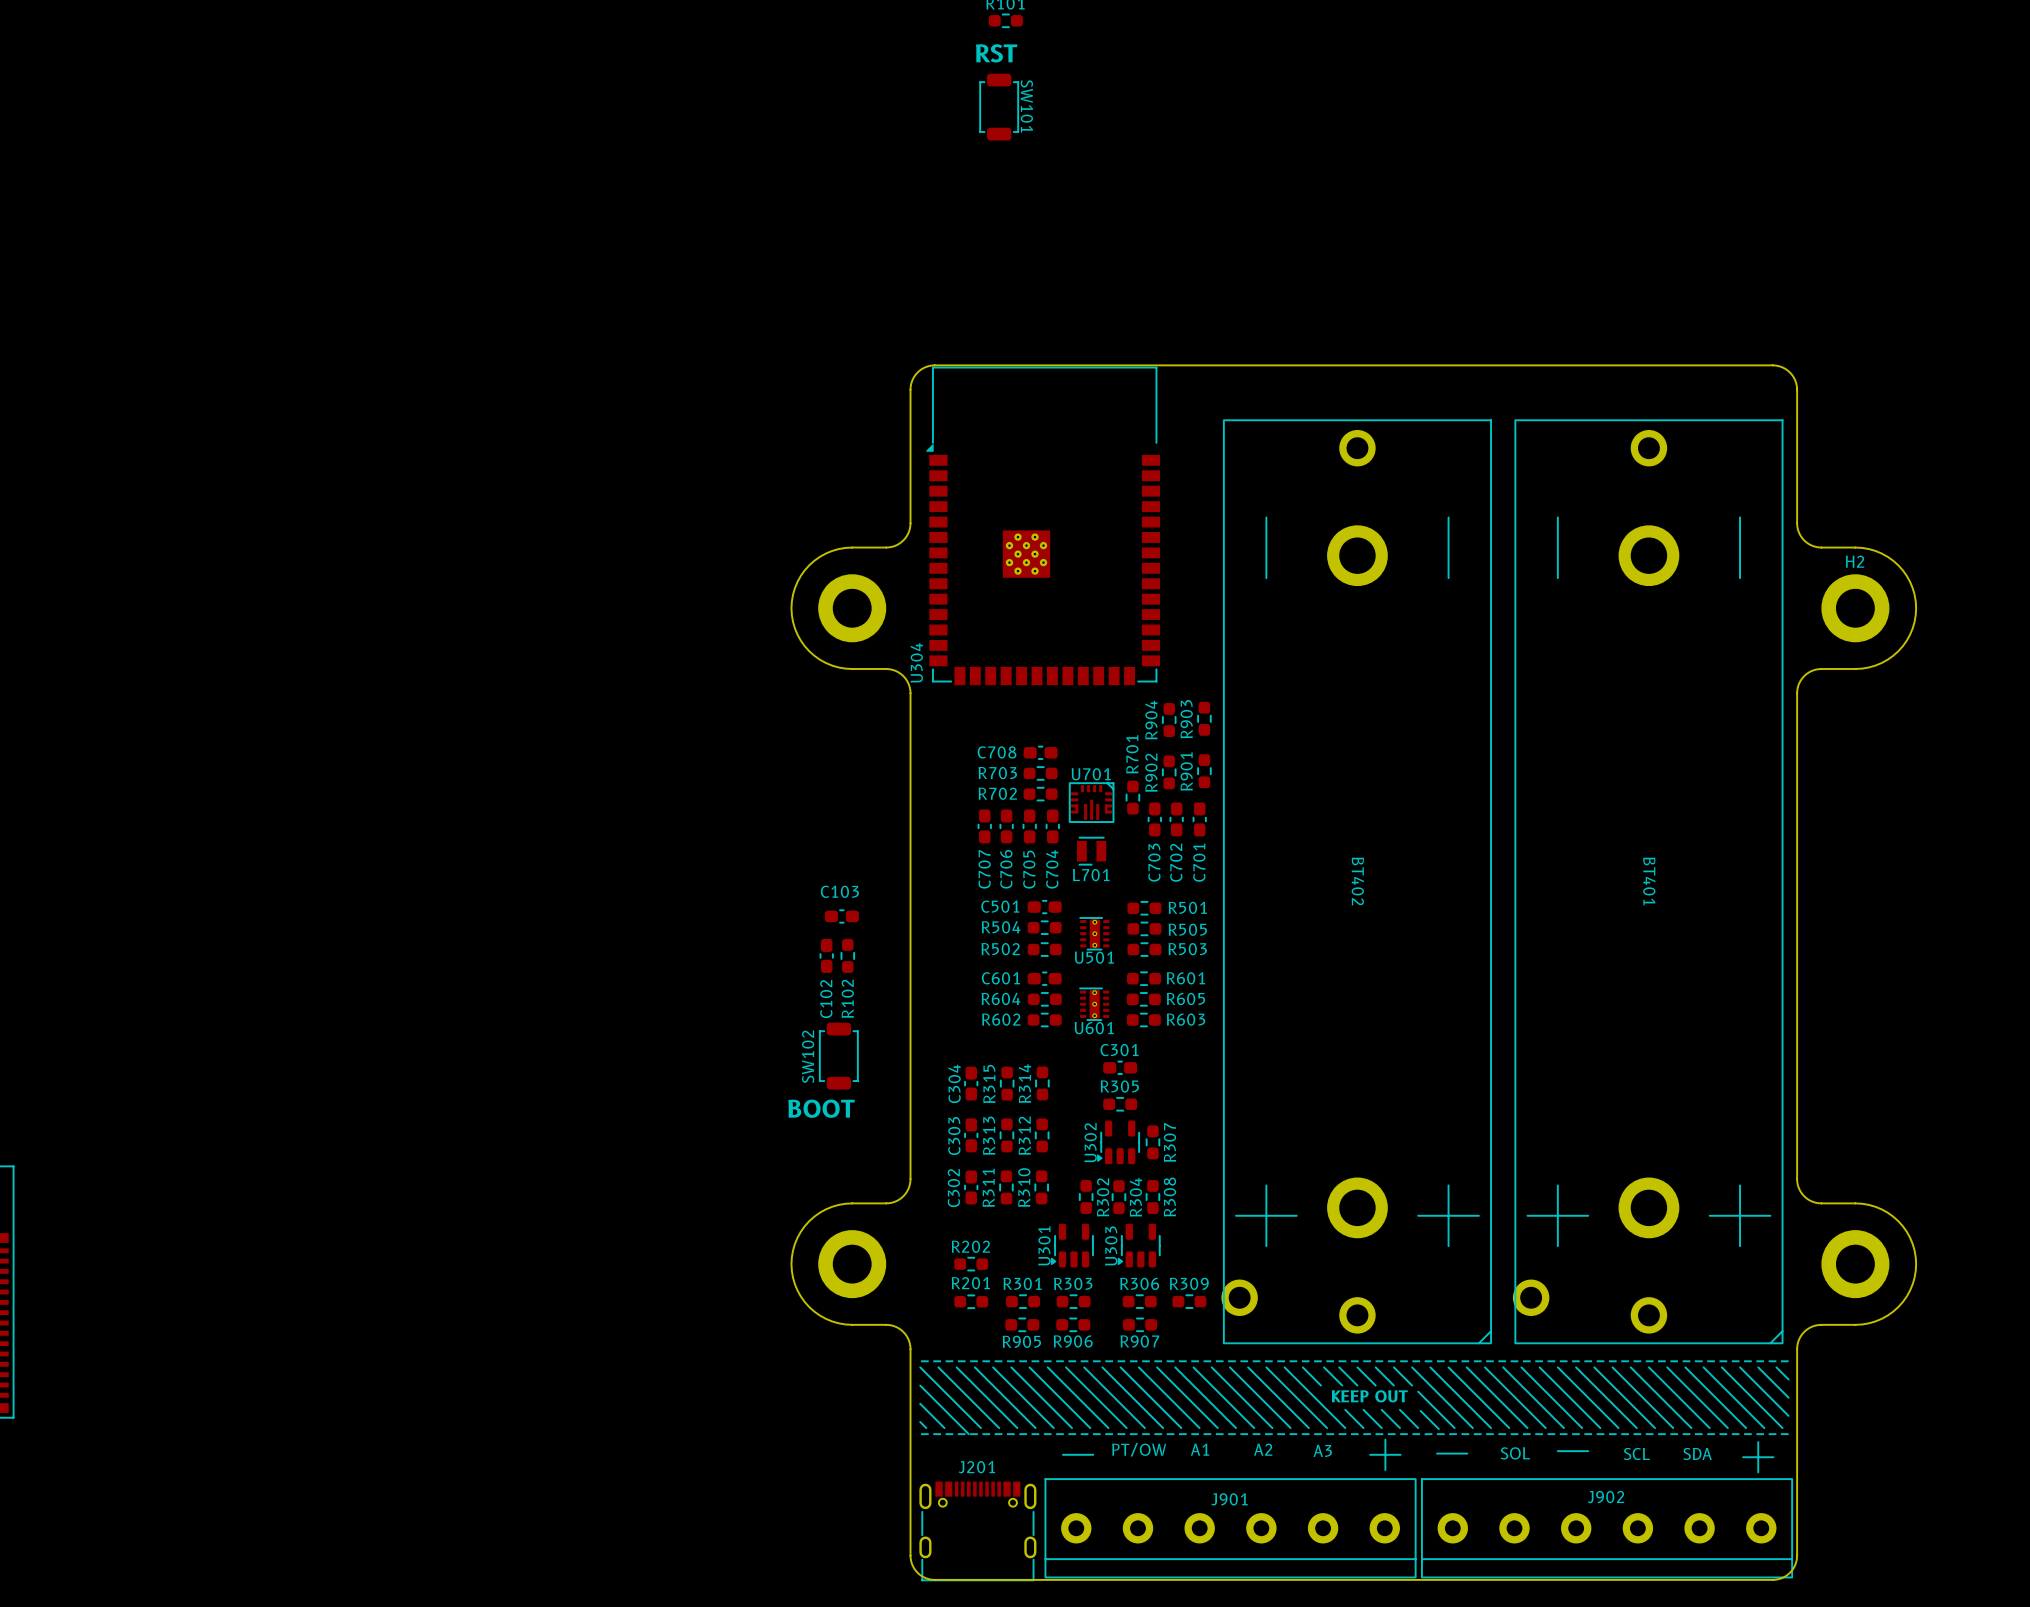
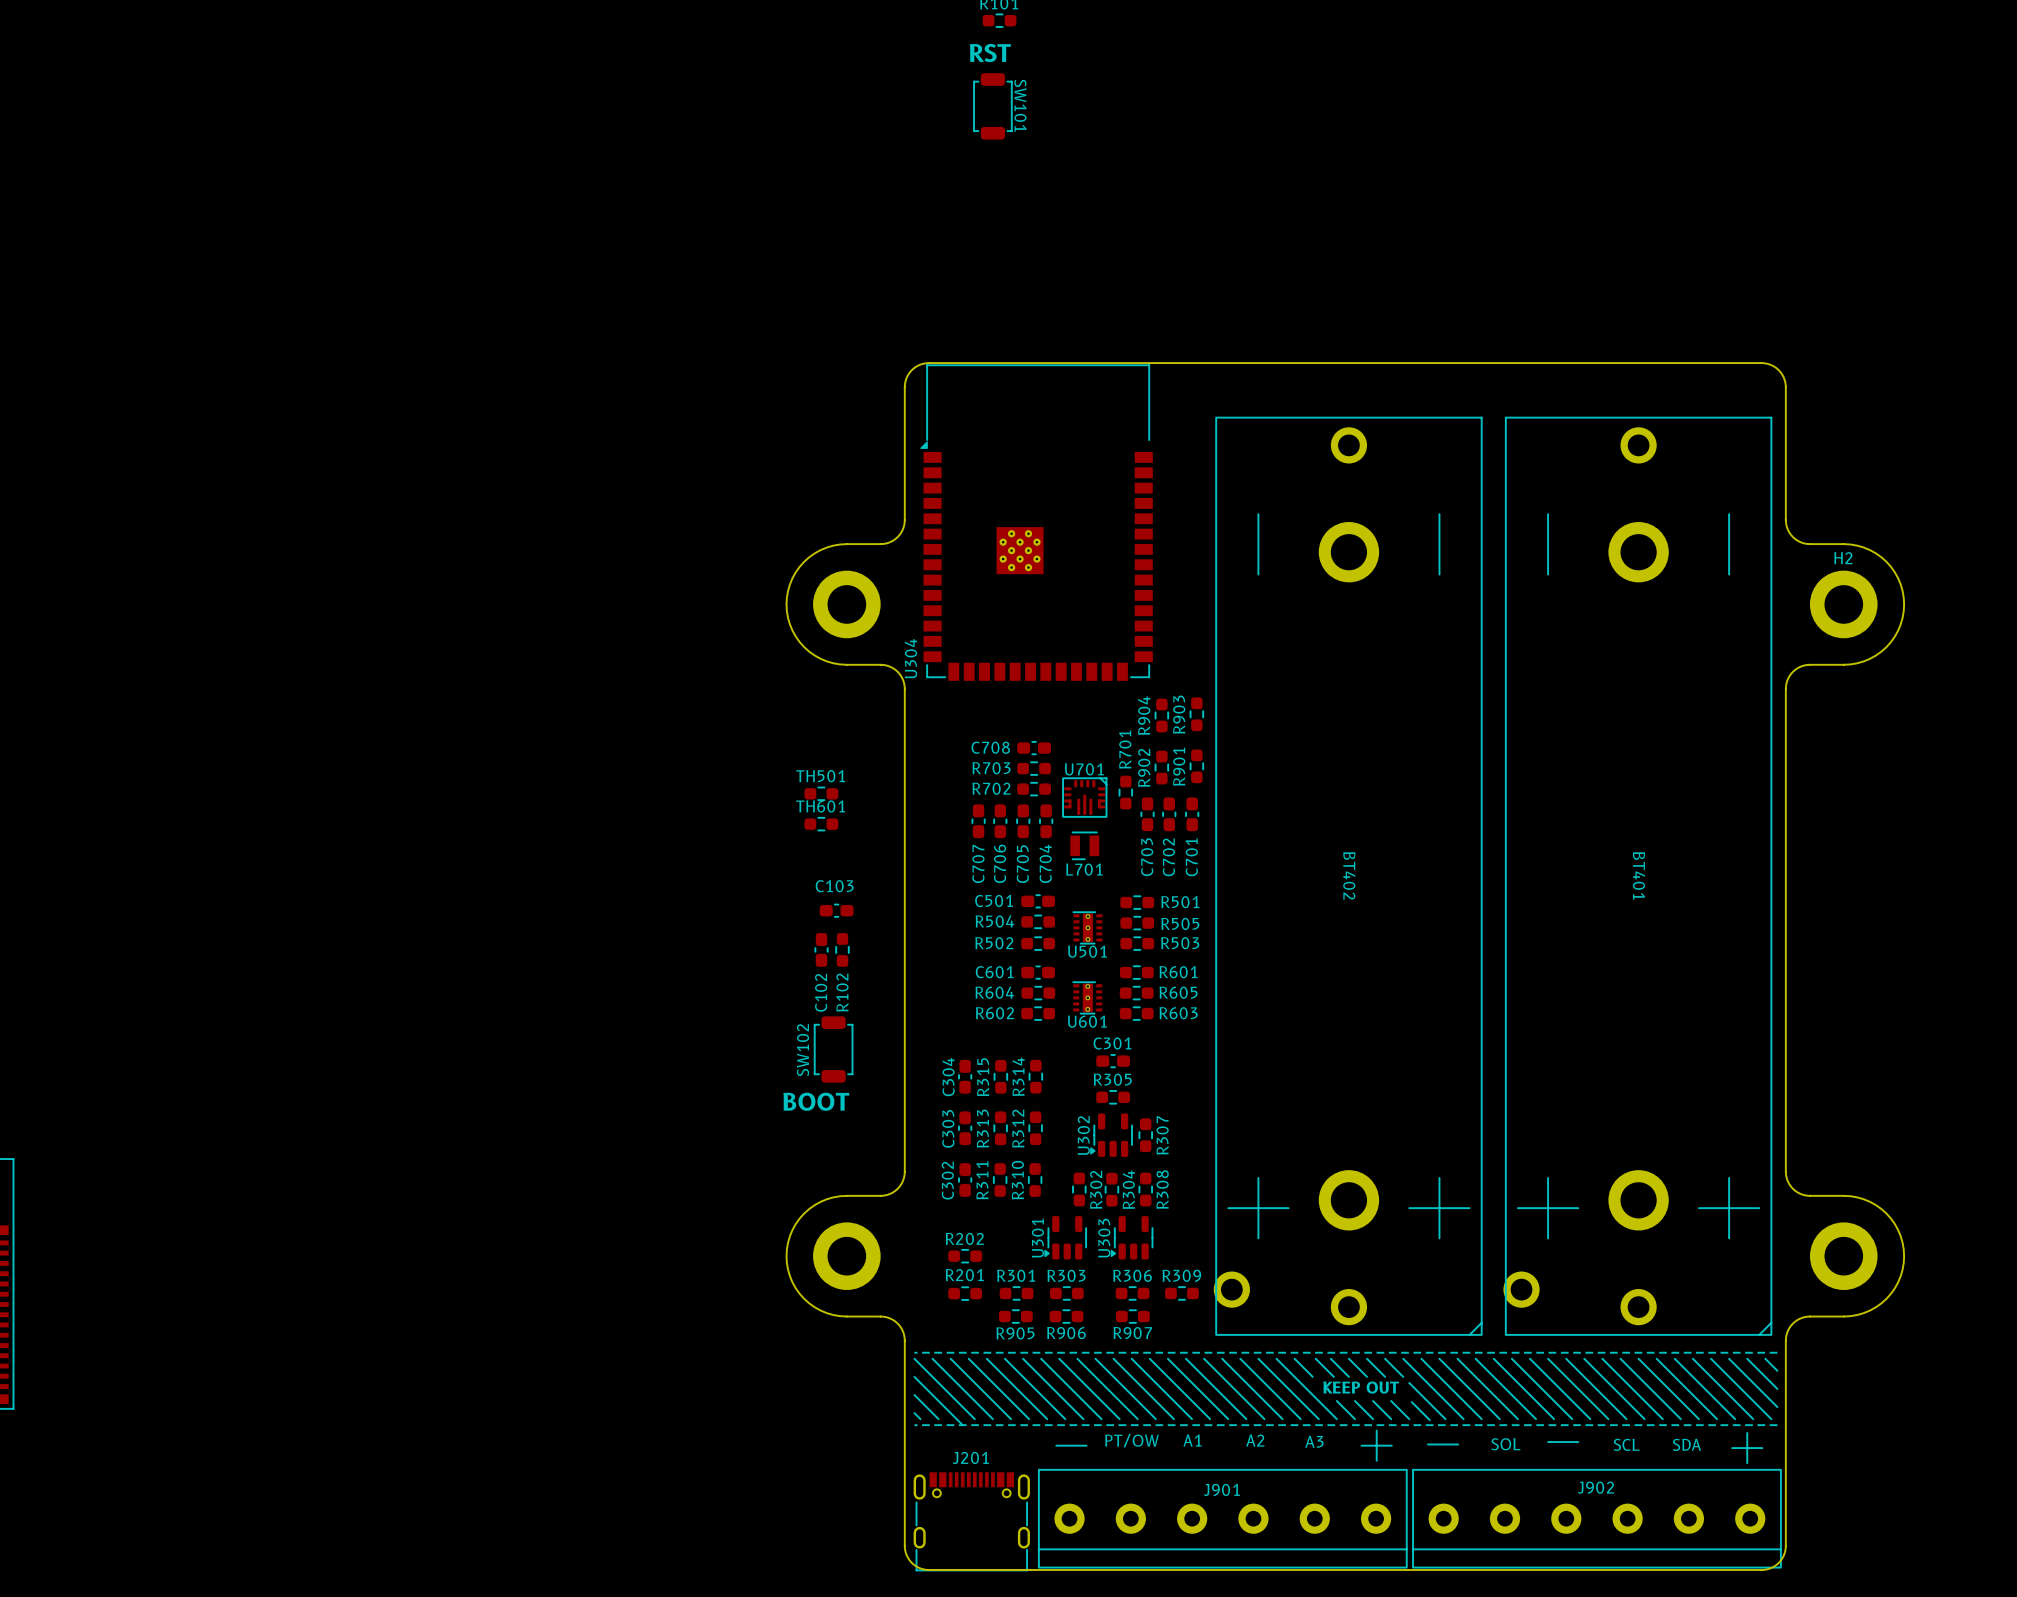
TH501: none -> (821, 793)
TH601: none -> (821, 824)

